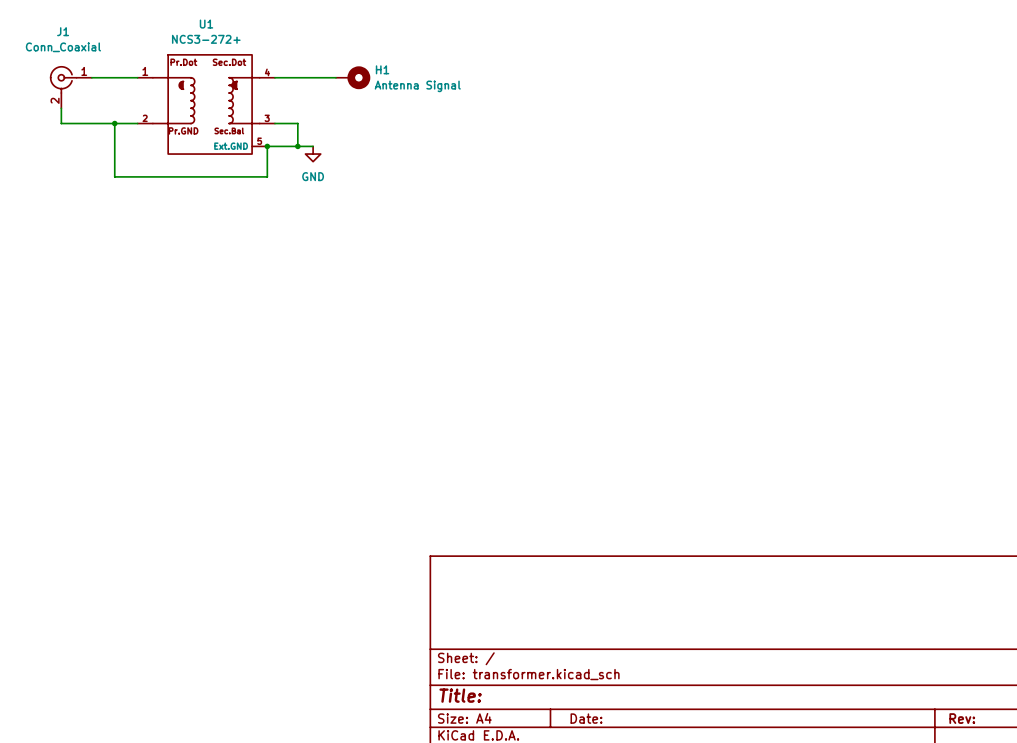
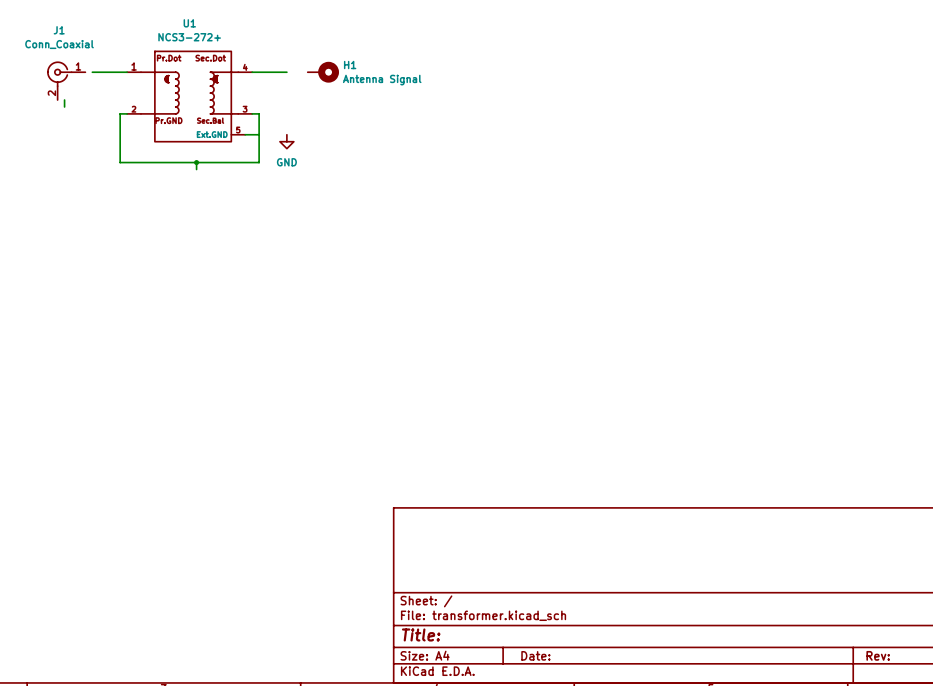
wire: (91, 77) (99, 77) -> none
wire: (313, 77) (335, 77) -> none
wire: (61, 108) (61, 123) (130, 123) -> none
wire: none -> (64, 100) (64, 106)
wire: (114, 123) (114, 176) (130, 176) -> (120, 113) (120, 162)
junction: (114, 123) -> none
wire: (282, 123) (297, 123) (297, 146) -> none
wire: (267, 146) (267, 176) -> (259, 113) (259, 162) (245, 162)
junction: (267, 146) -> none
wire: (282, 146) (313, 146) -> none
junction: (297, 146) -> none
wire: none -> (196, 162) (196, 169)
junction: none -> (196, 162)

